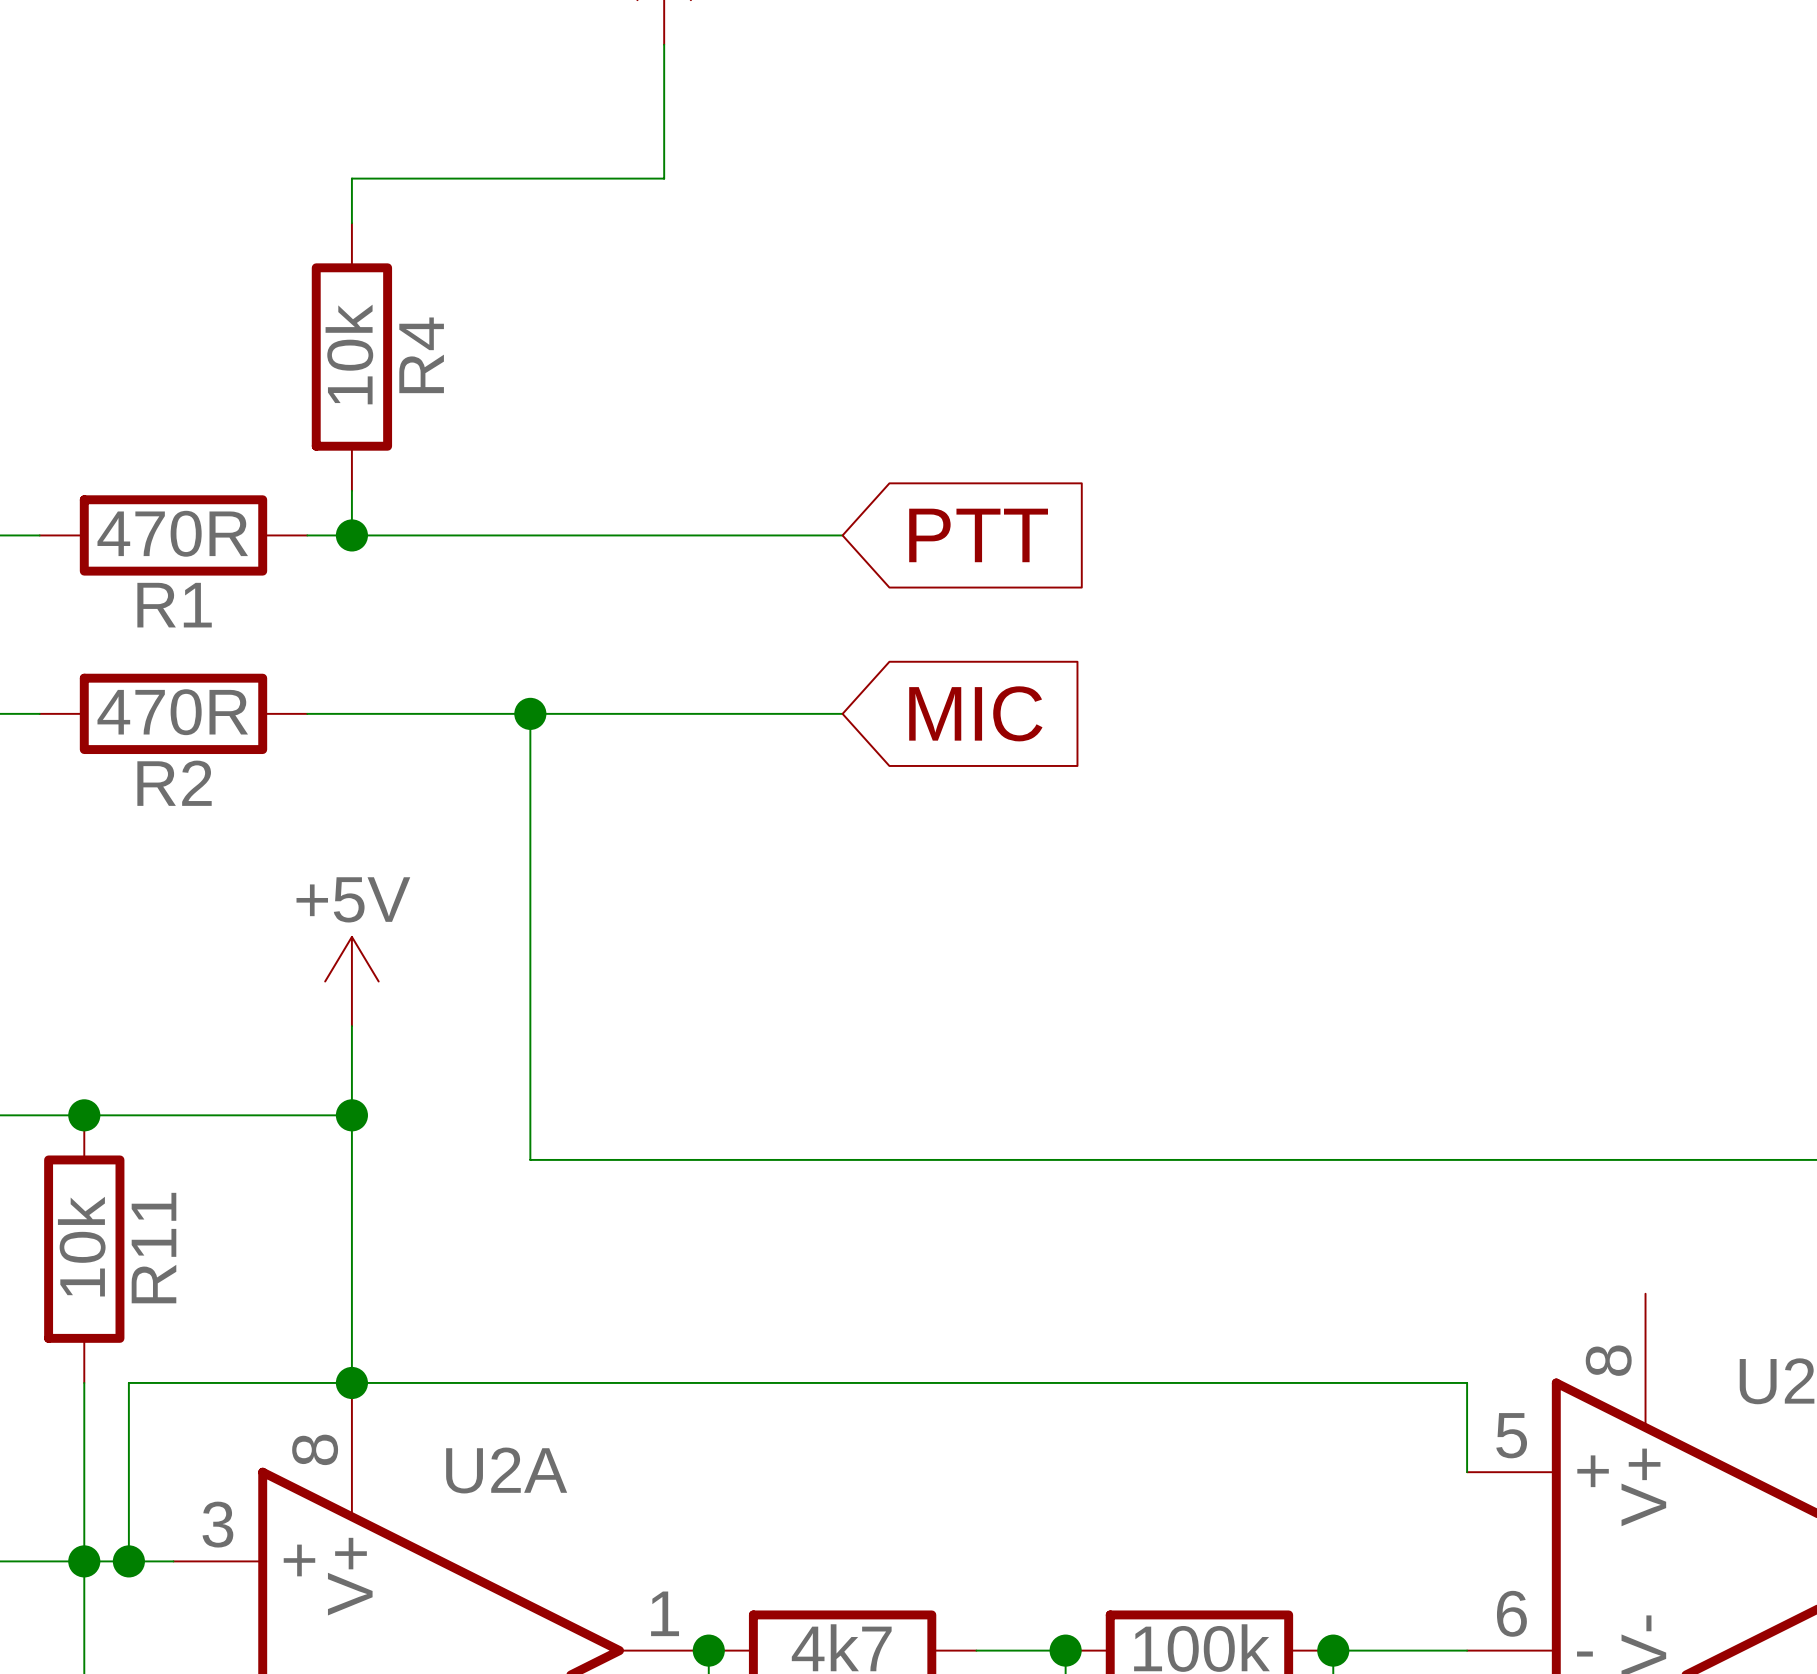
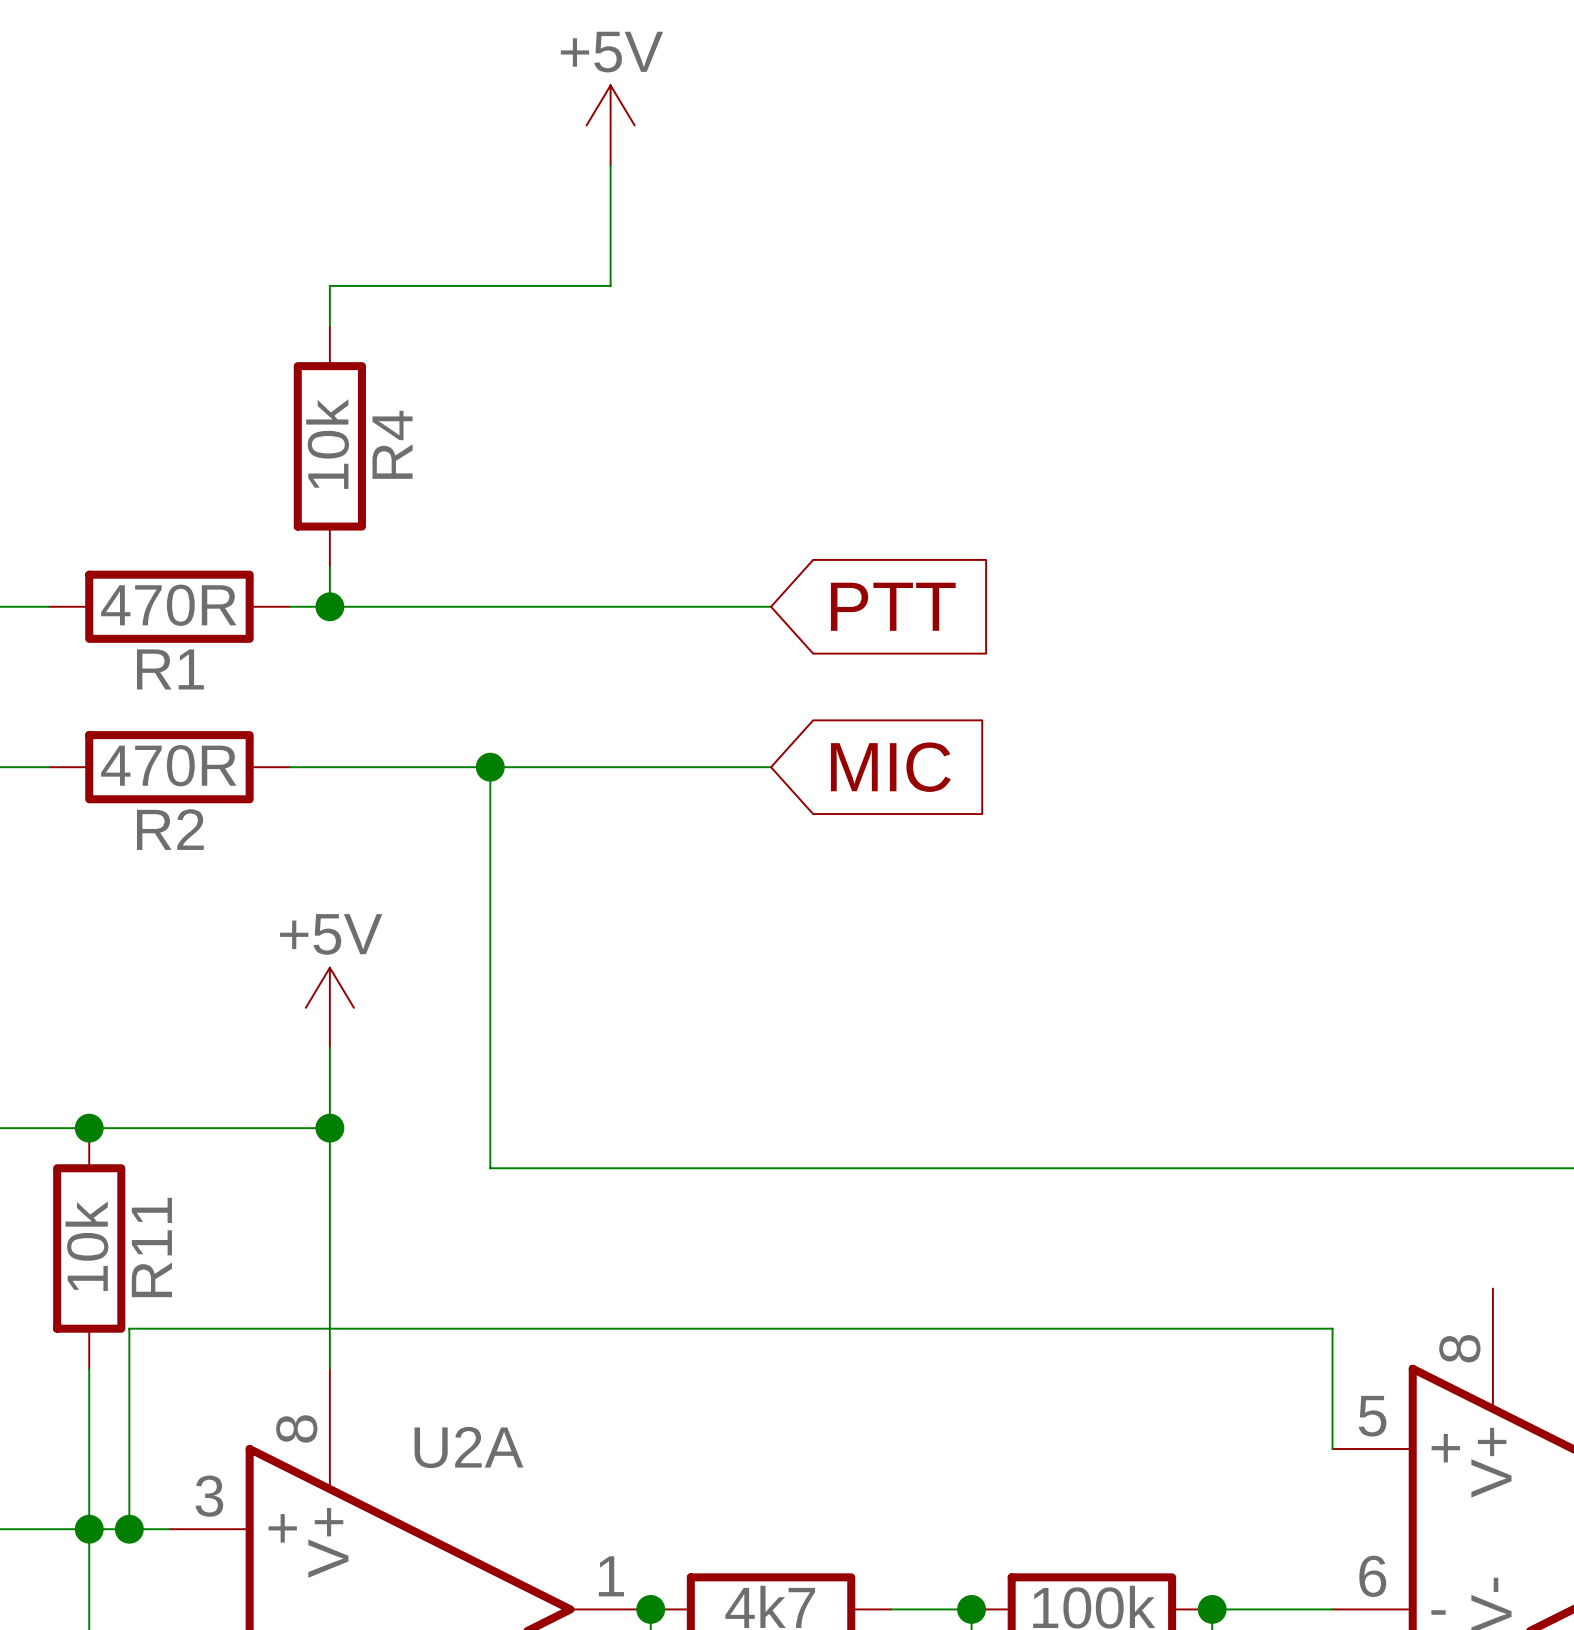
wire: (128, 1382) (1467, 1382) -> (129, 1368) (129, 1328) (1332, 1328) (1332, 1368)
junction: (351, 1382) -> none

